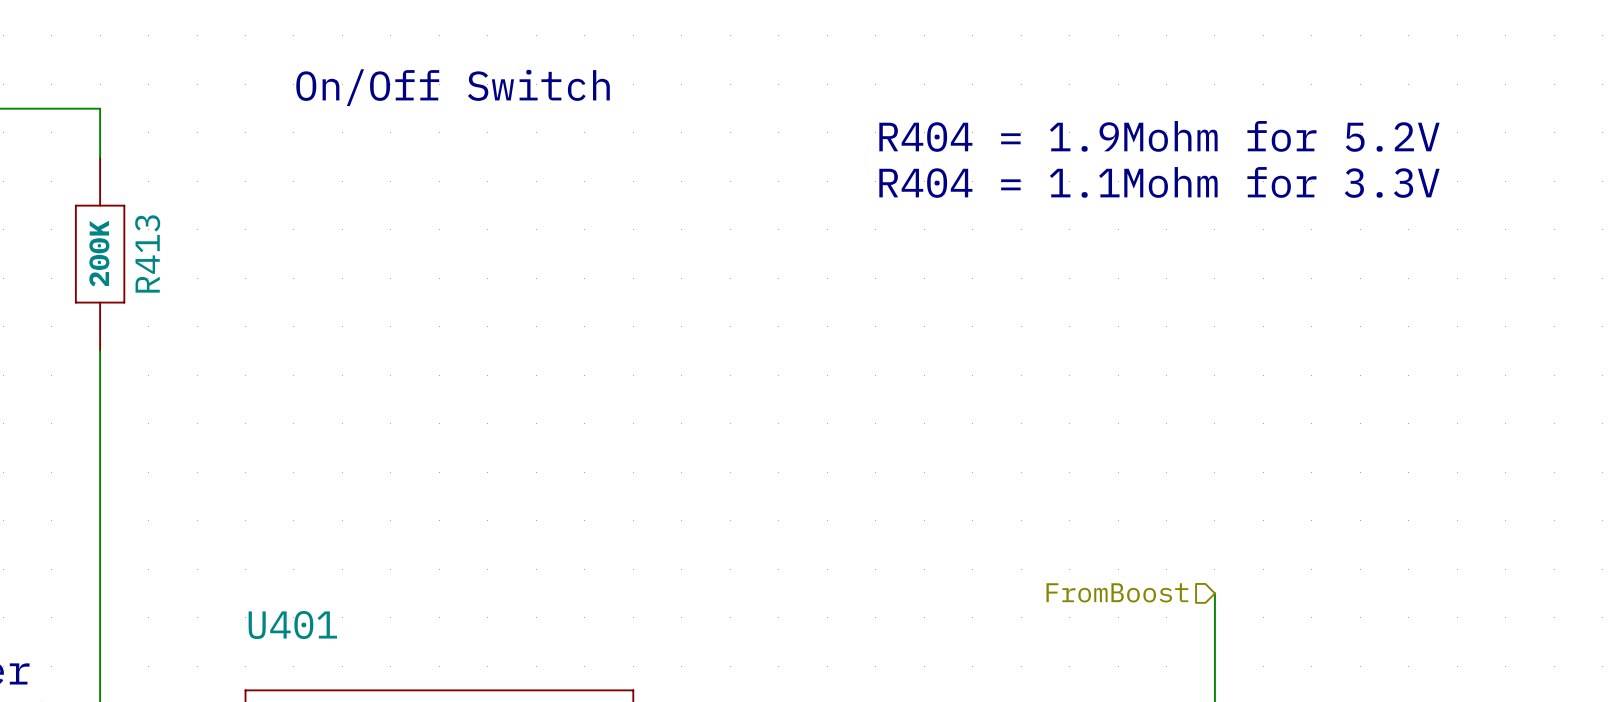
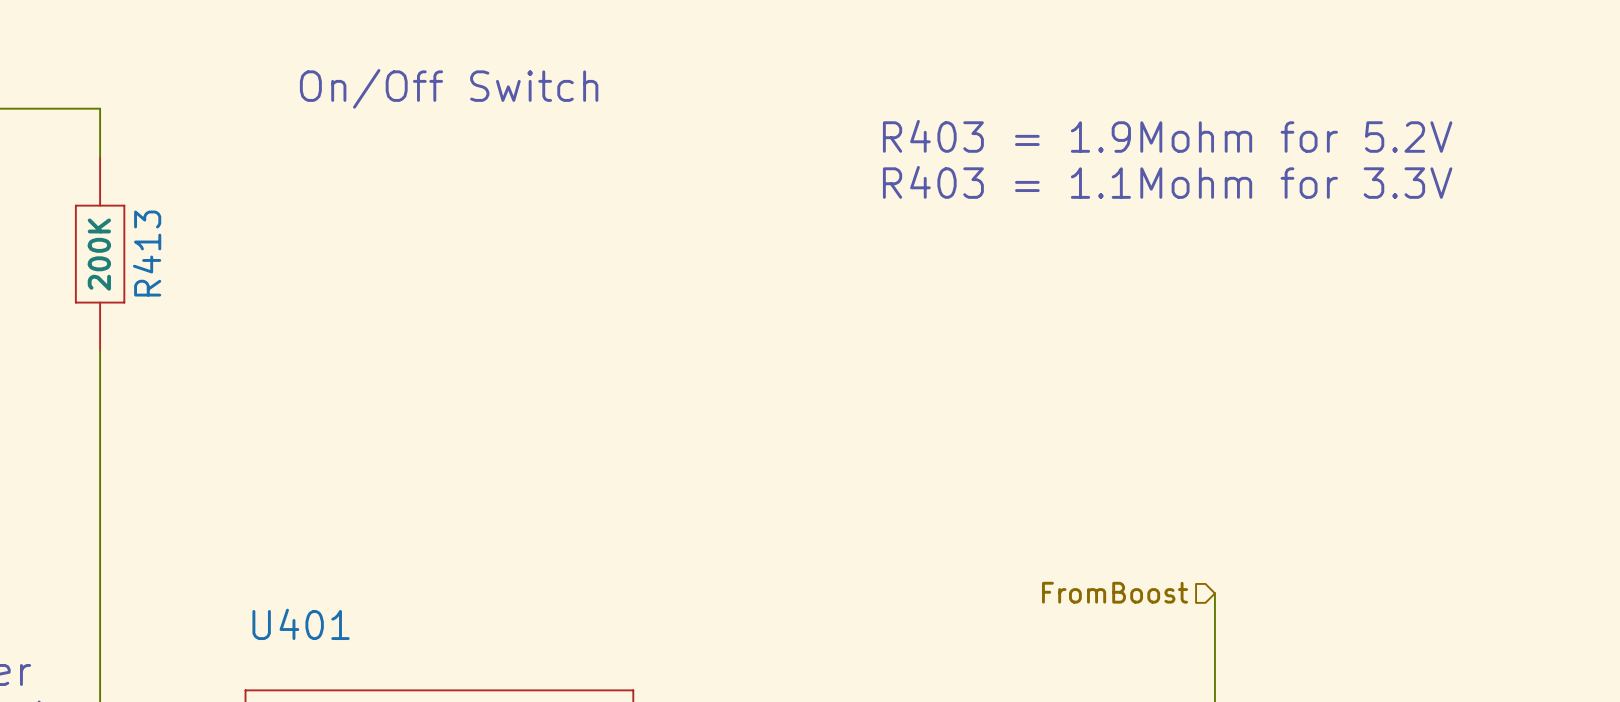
text: R404 = 1.9Mohm for 5.2V (1159, 136) -> R403 = 1.9Mohm for 5.2V (1167, 136)
text: R404 = 1.1Mohm for 3.3V (1159, 182) -> R403 = 1.1Mohm for 3.3V (1167, 182)

